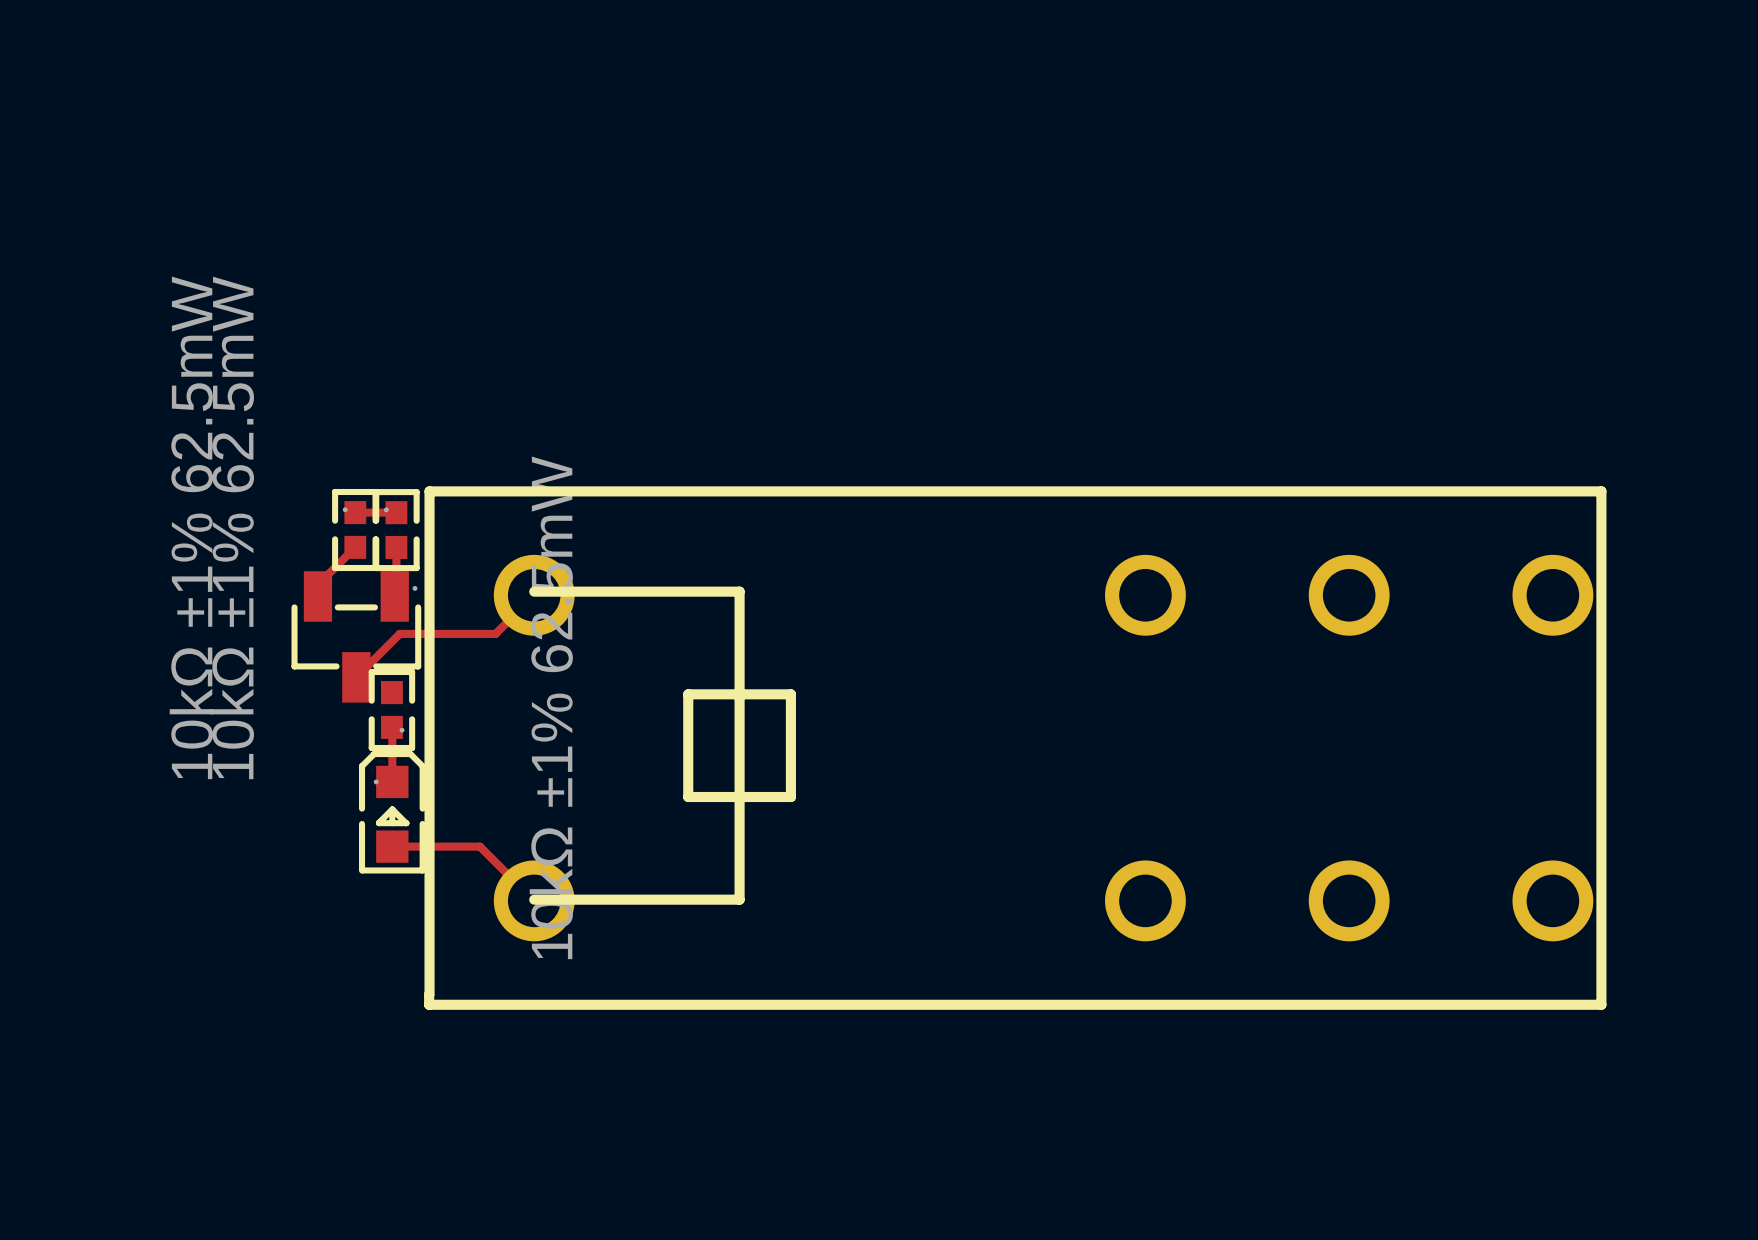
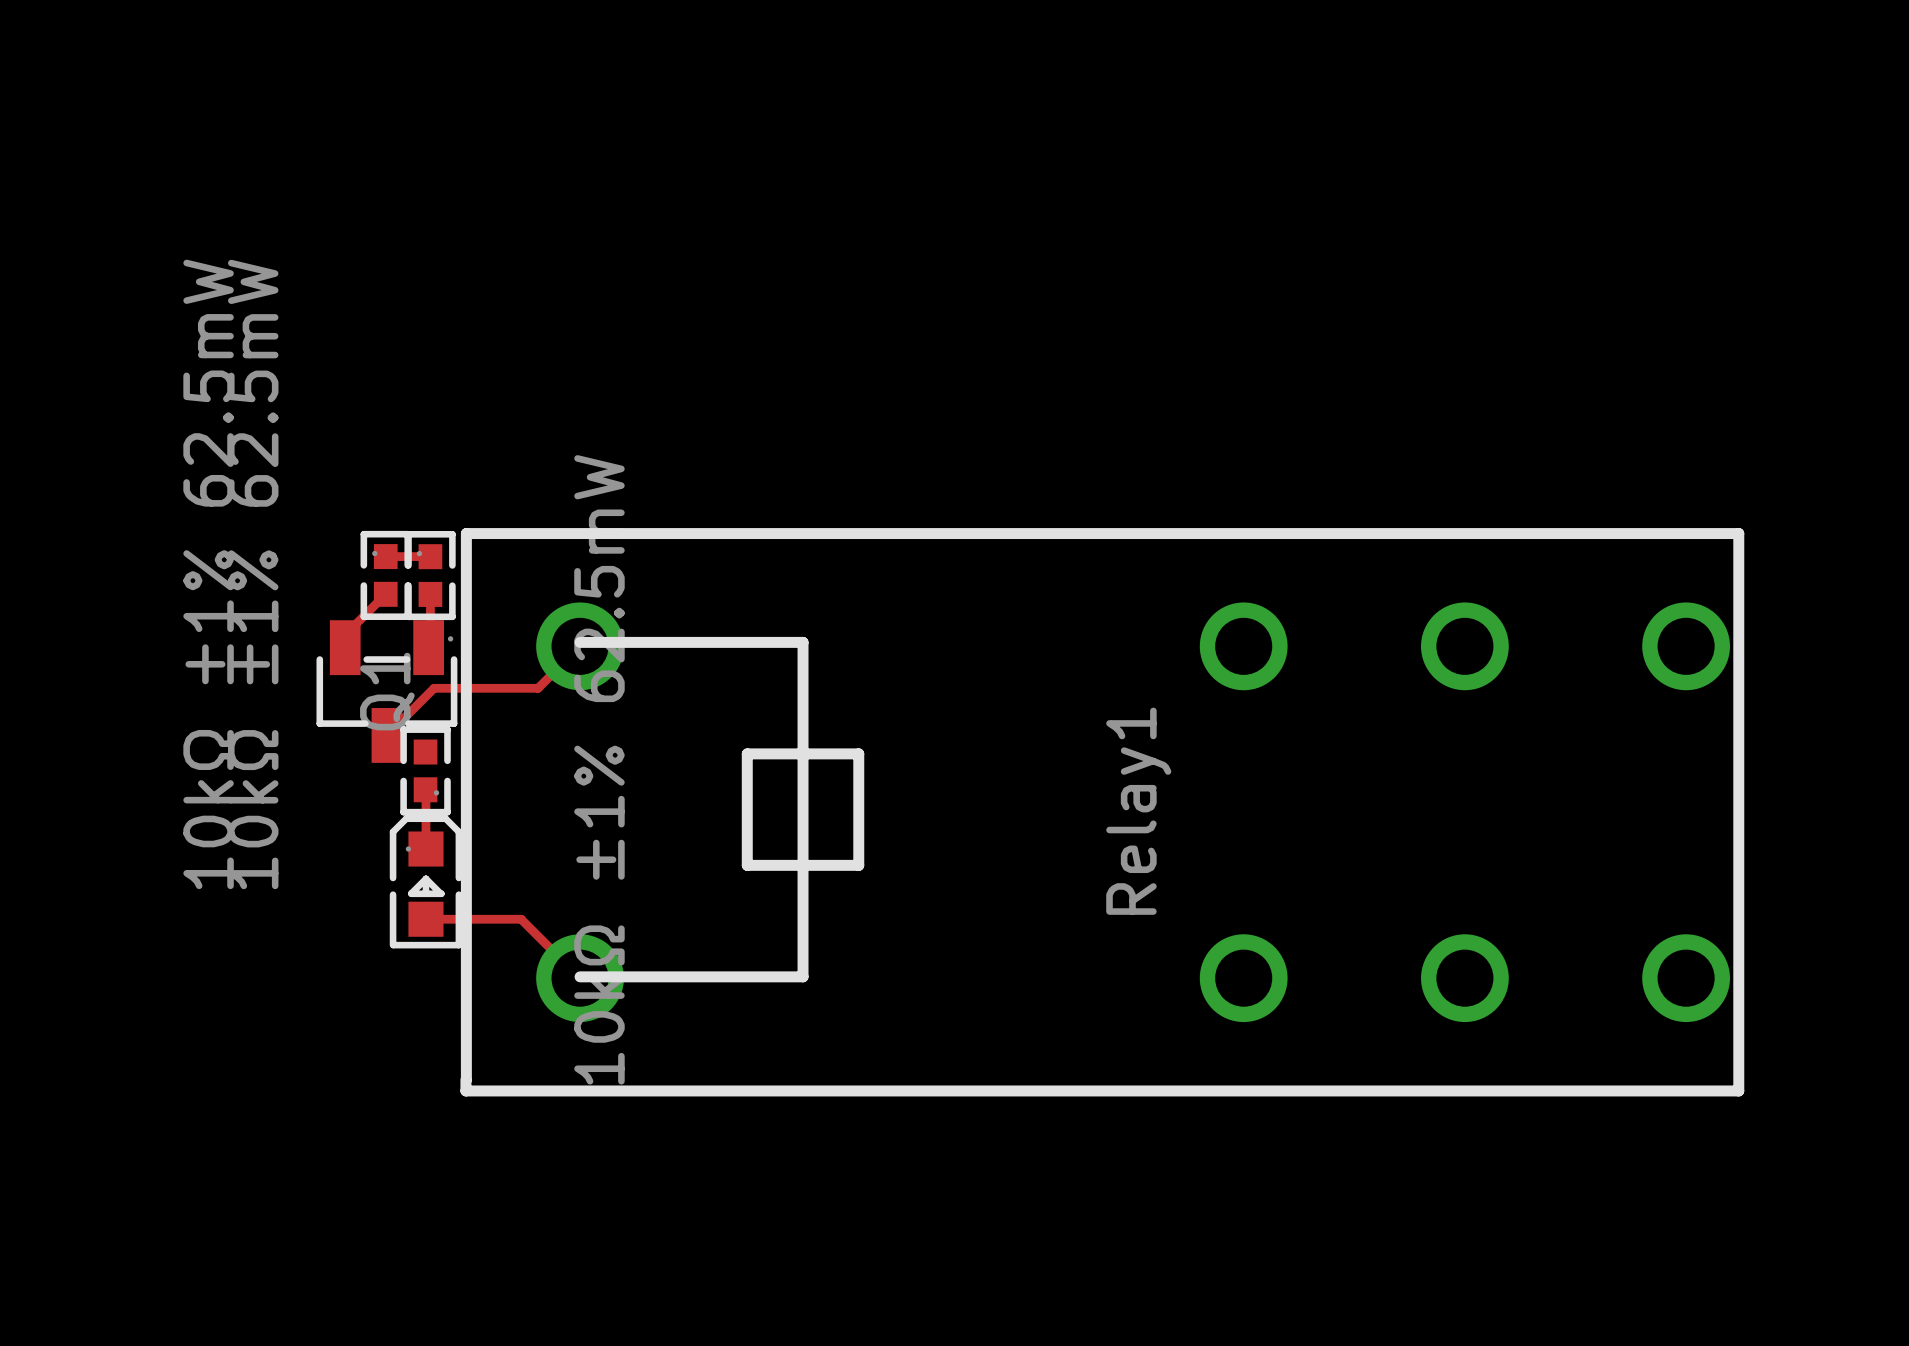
Q1 name: none -> Q1 (387, 691)
Relay1 name: none -> Relay1 (1138, 811)

